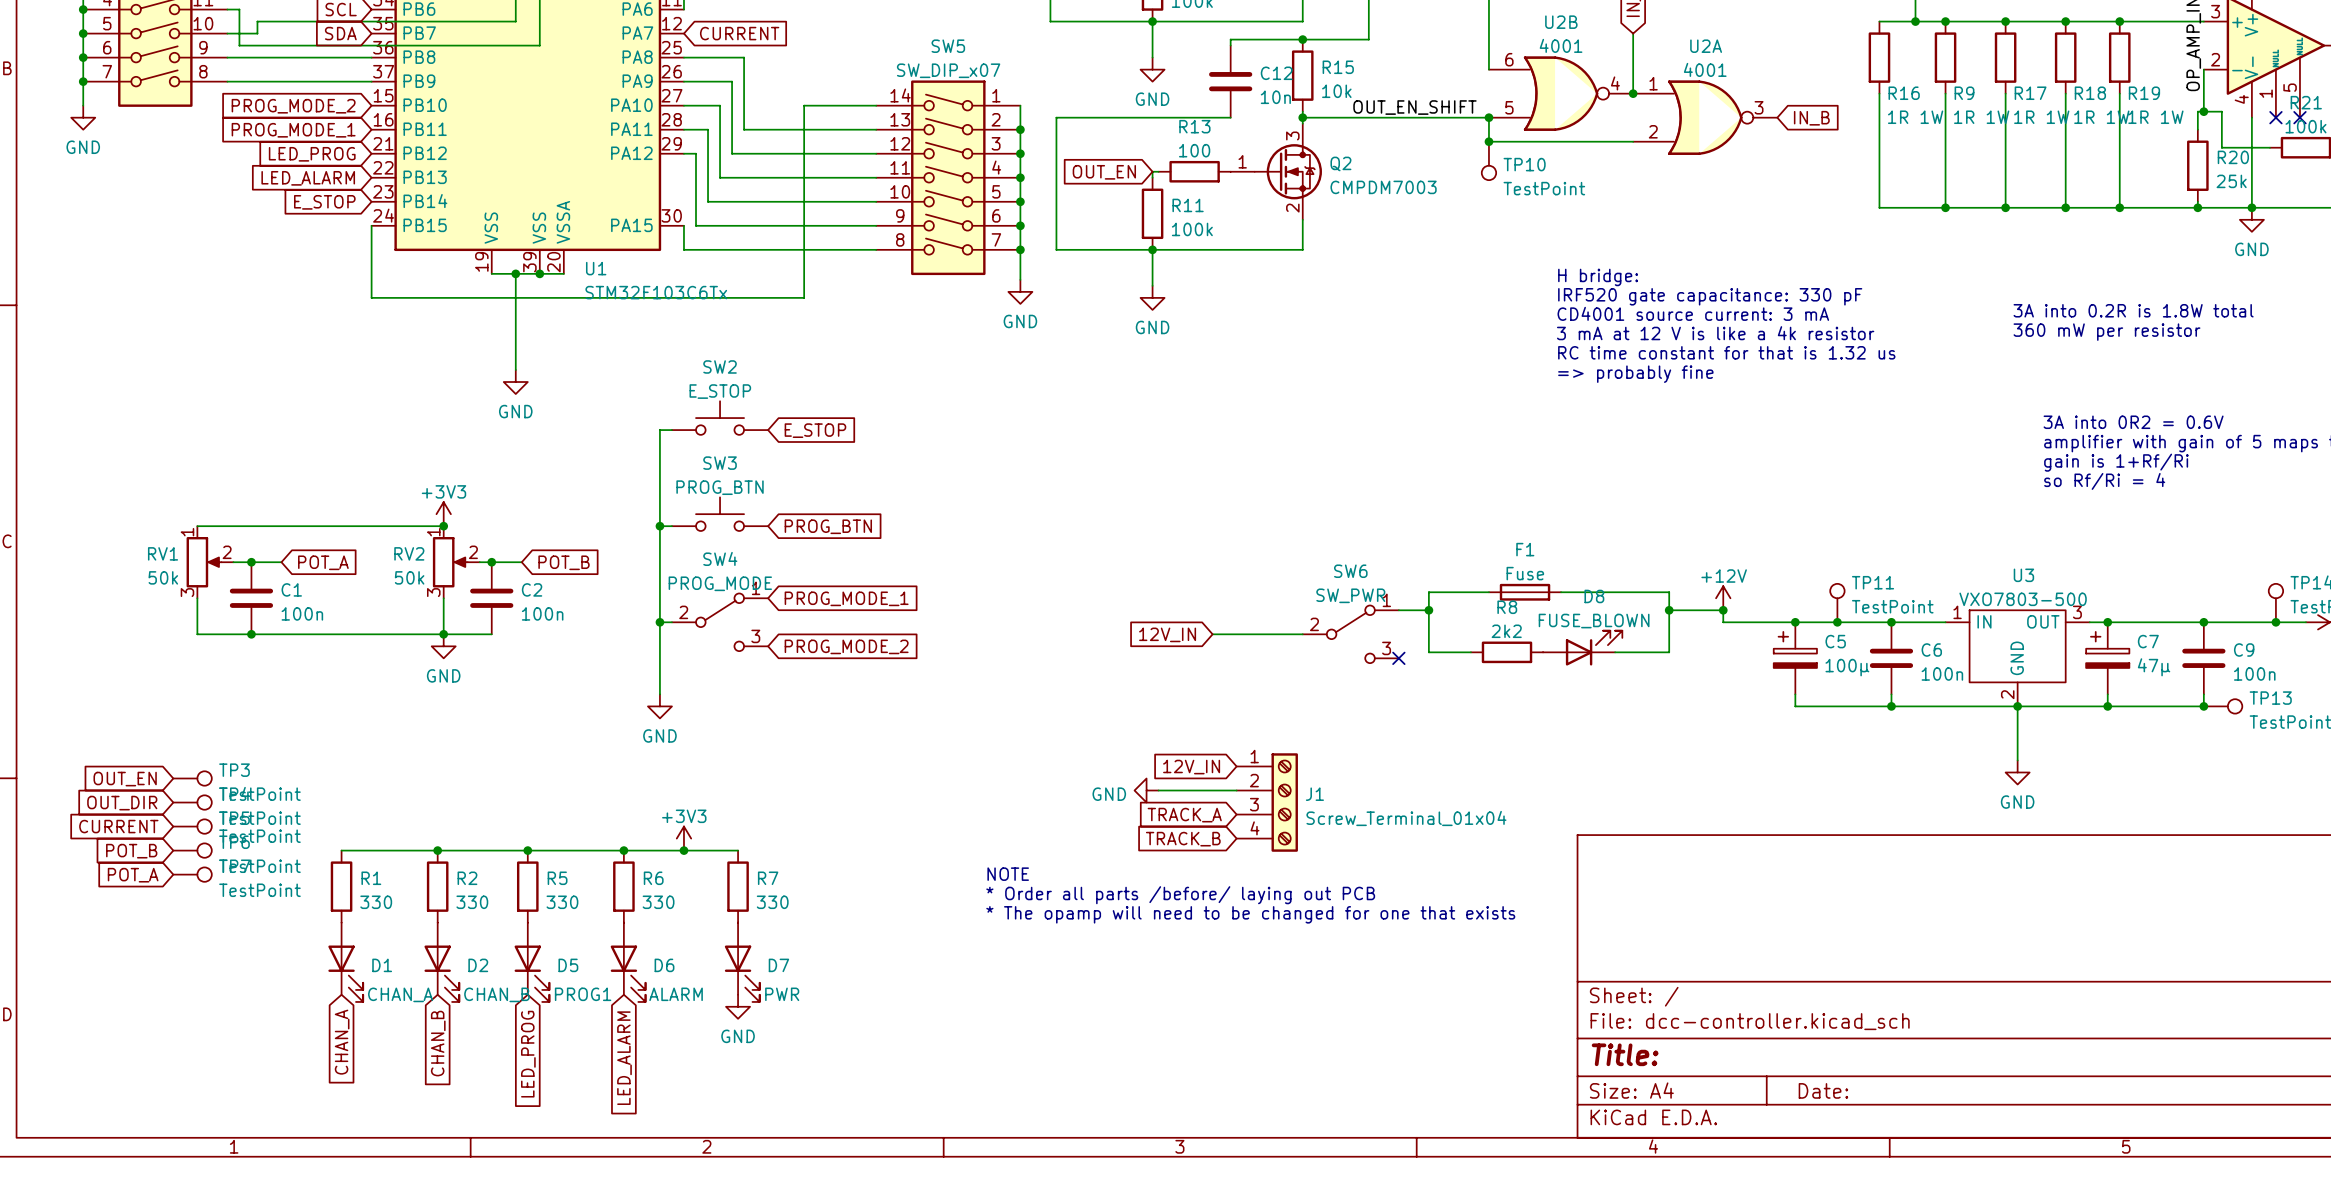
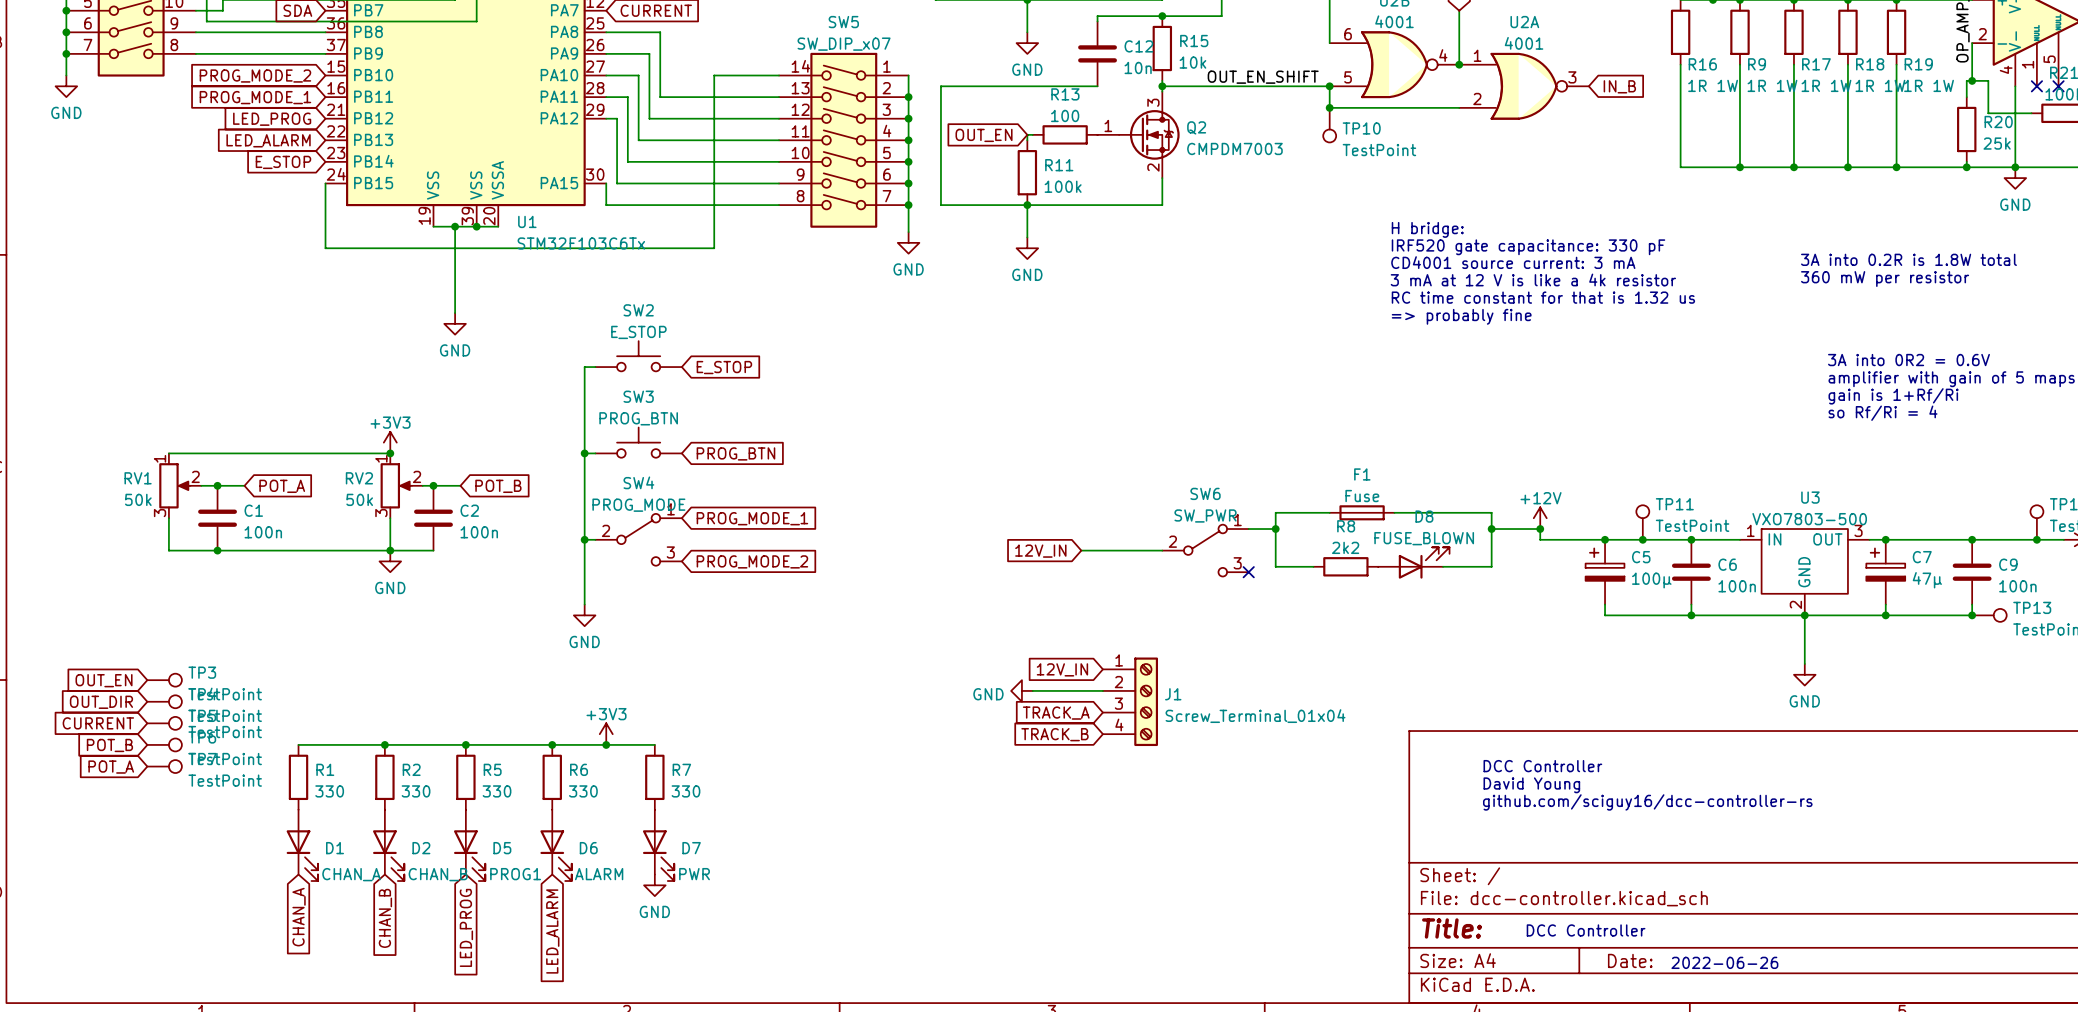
text: NOTE (1008, 874) -> none
text: none -> DCC Controller (1542, 766)
text: * Order all parts /before/ laying out PCB (1180, 895) -> none
text: none -> David Young (1531, 785)
text: * The opamp will need to be changed for one that exists (1250, 914) -> none
text: none -> github.com/sciguy16/dcc-controller-rs (1647, 802)
text: none -> DCC Controller (1586, 930)
text: none -> 2022-06-26 (1724, 962)

